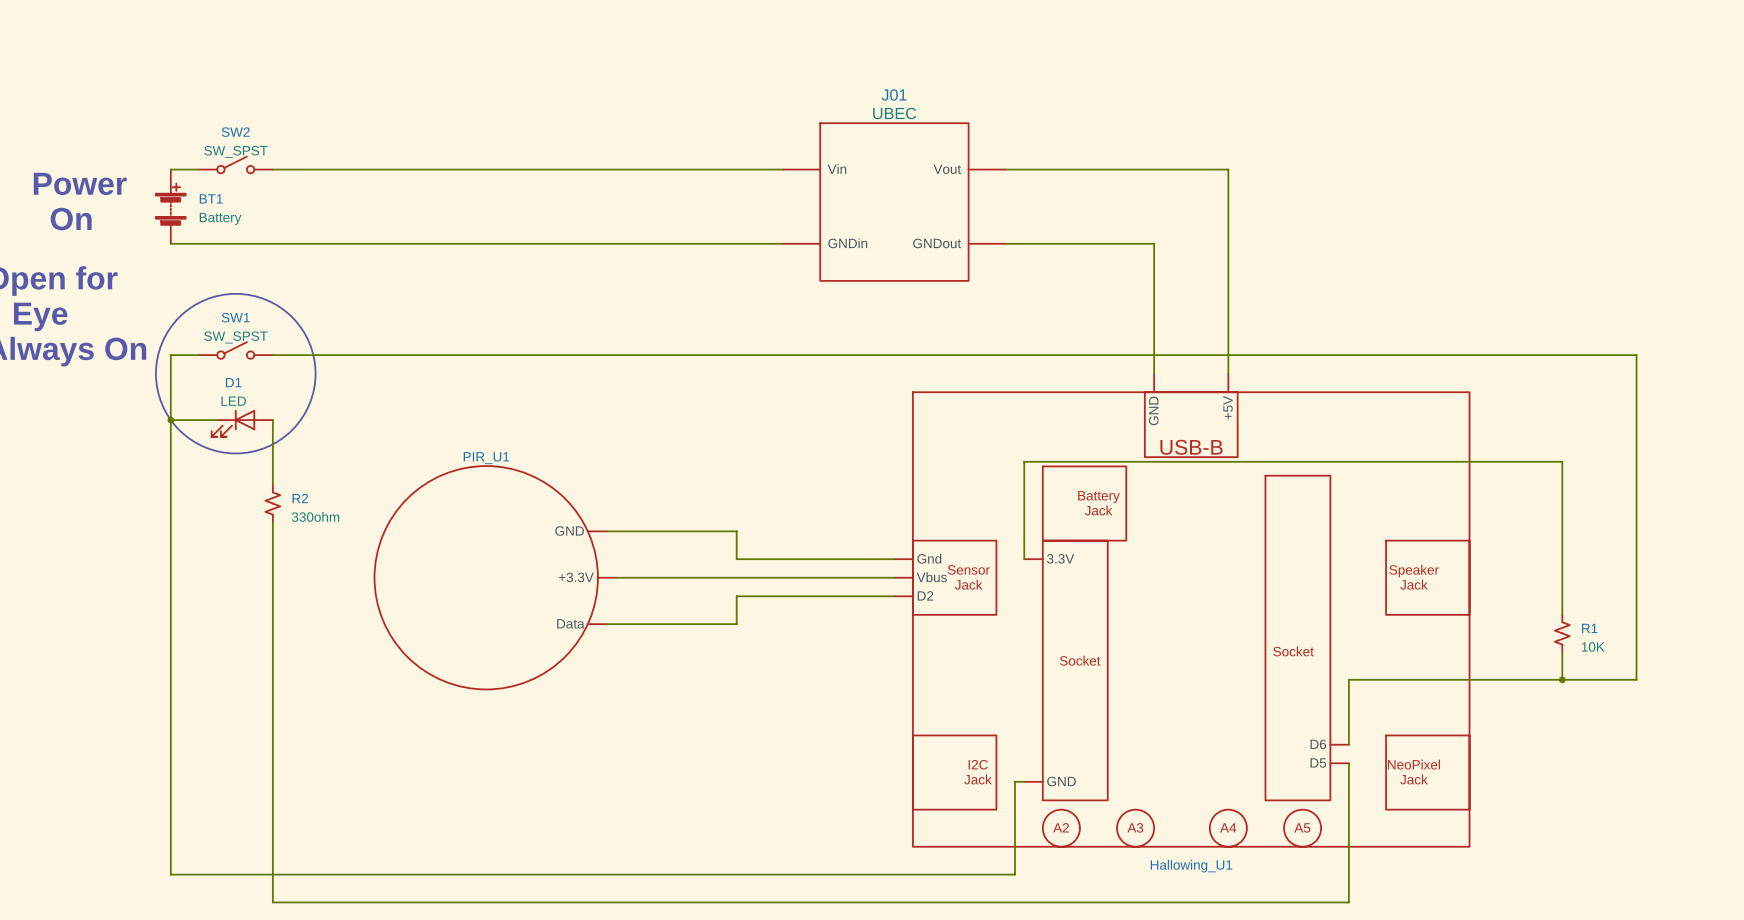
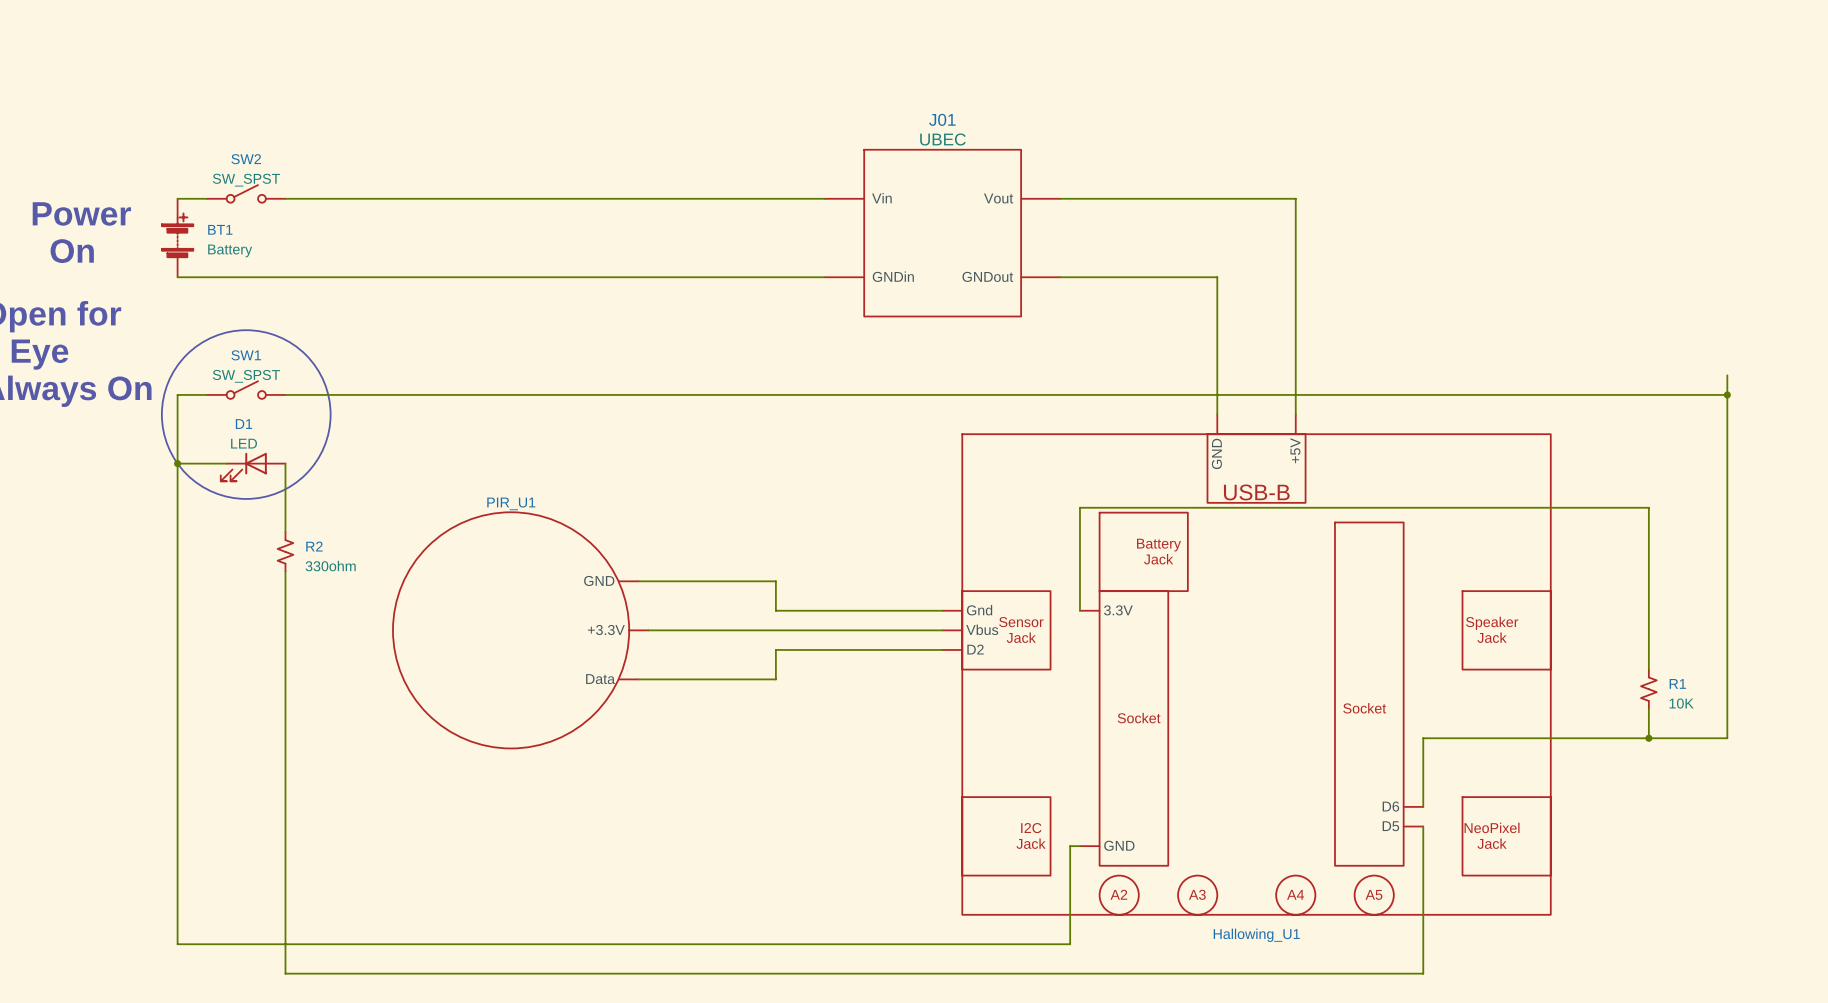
wire: none -> (1727, 375) (1727, 394)
junction: none -> (1727, 394)

